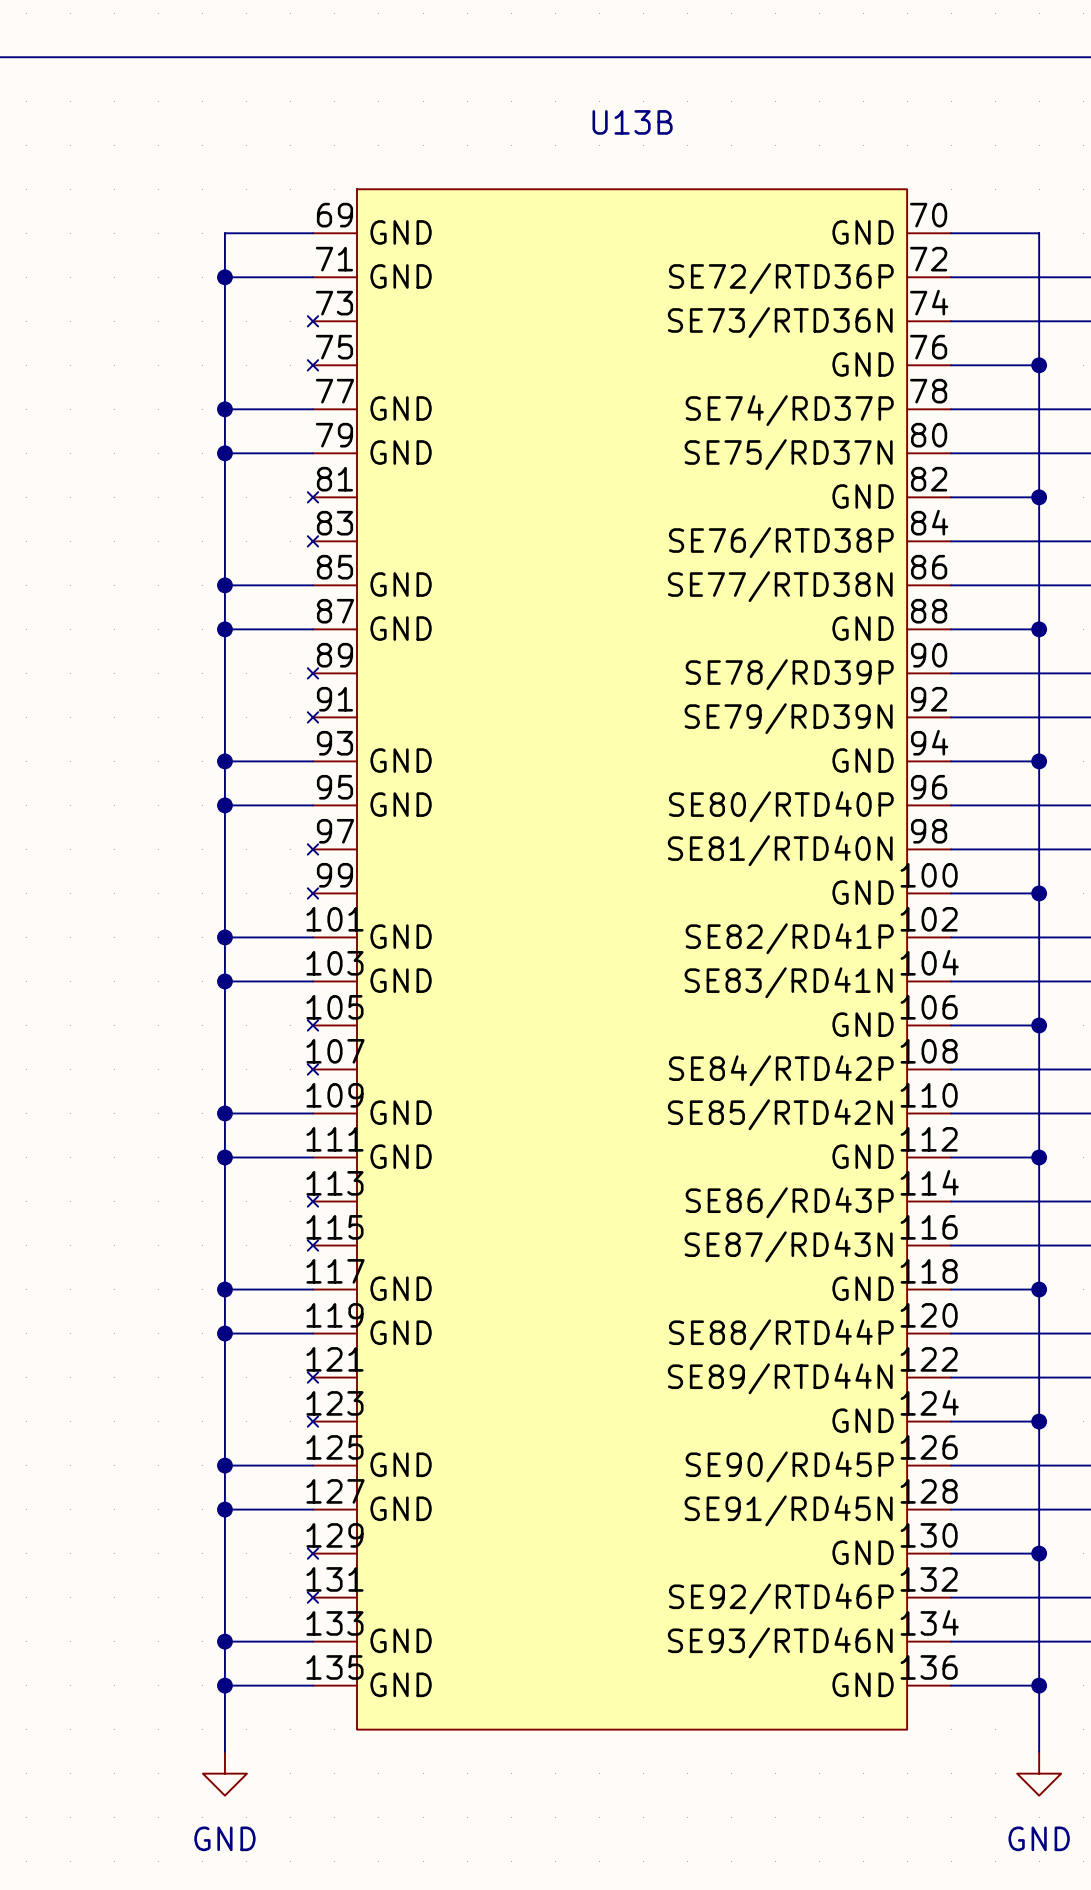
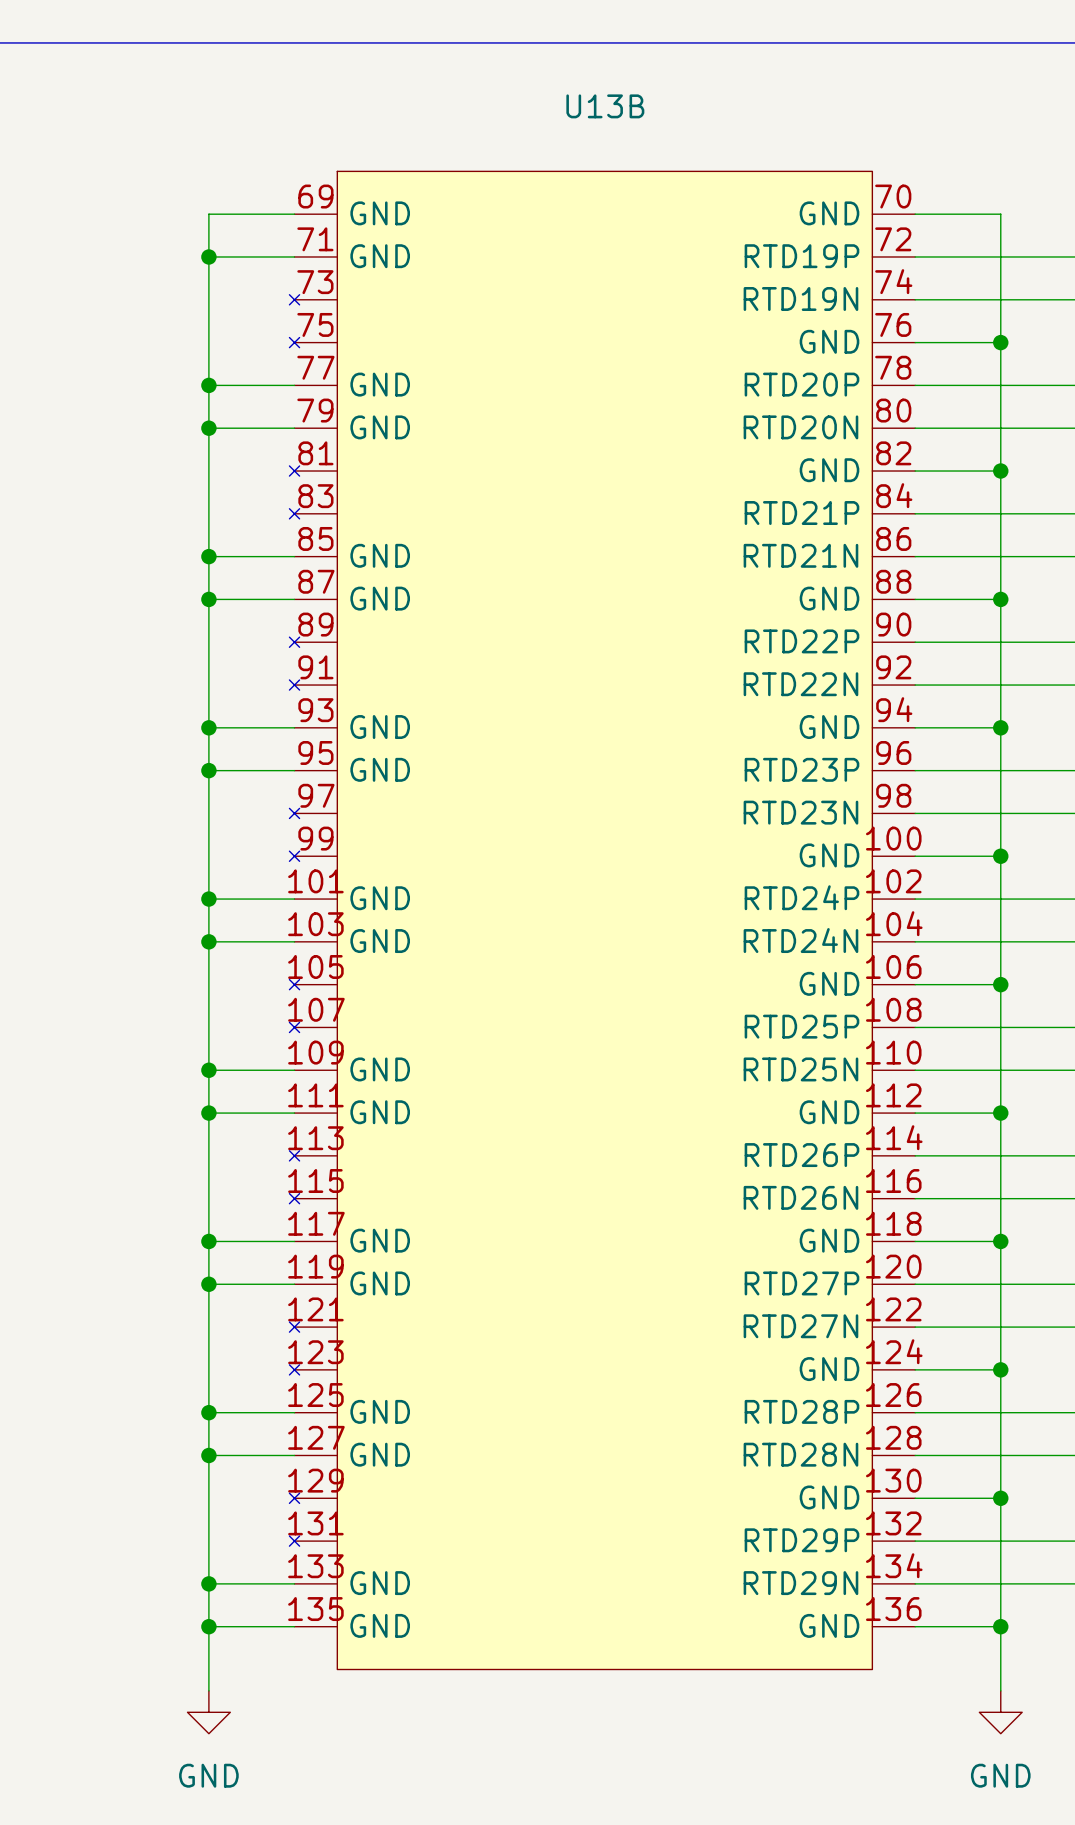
U13B symbol: [307, 189, 952, 1730] -> [289, 171, 916, 1670]

